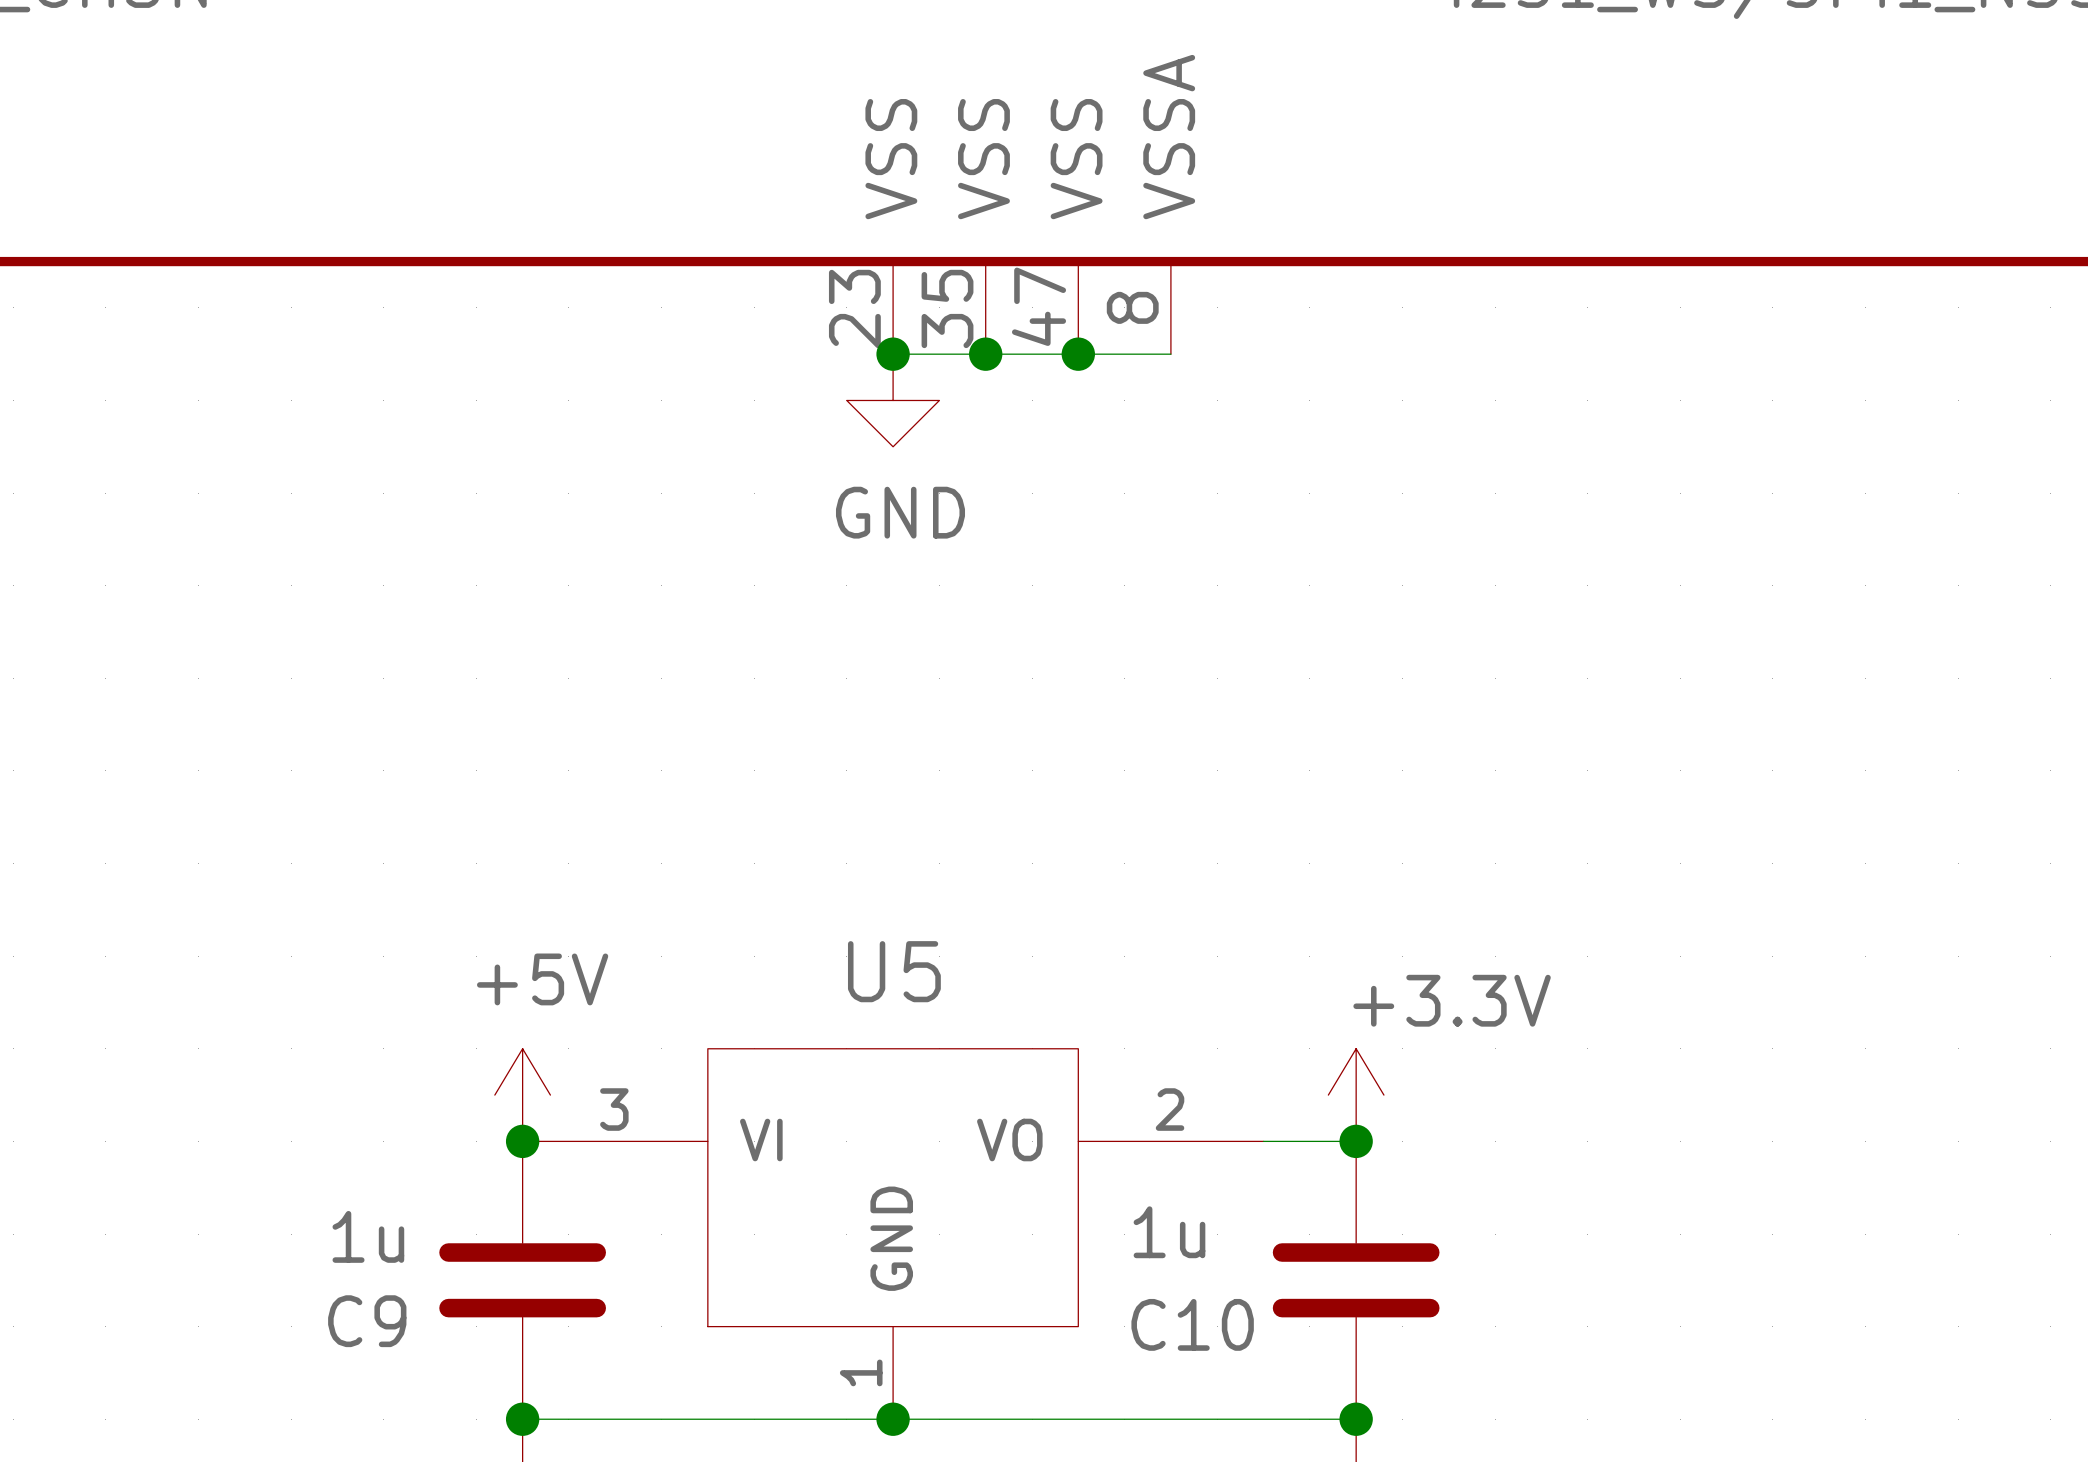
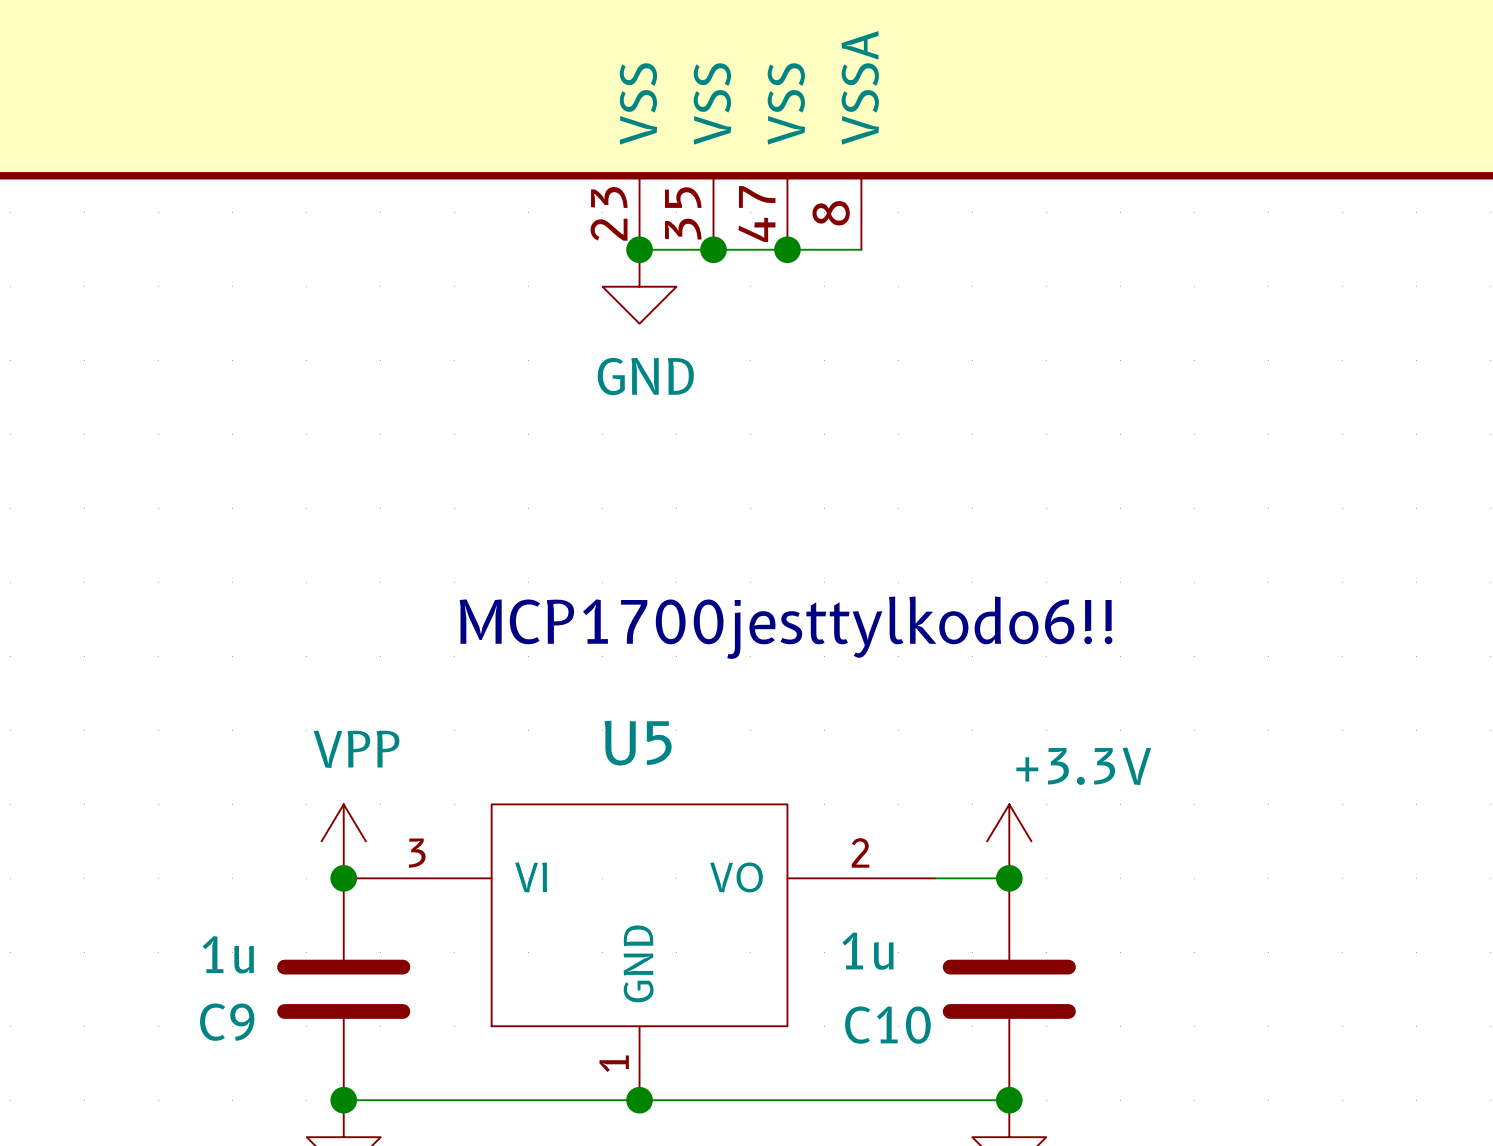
text: none -> MCP1700jesttylkodo6!! (786, 627)
power symbol: +5V (522, 1095) -> VPP (343, 841)

